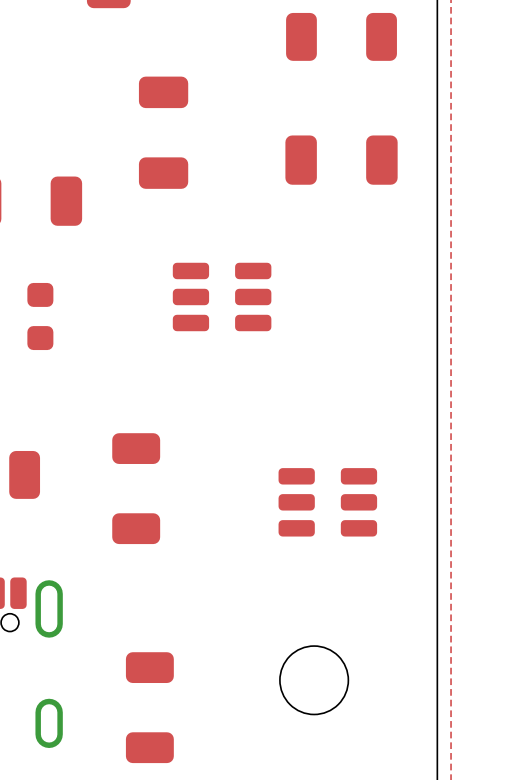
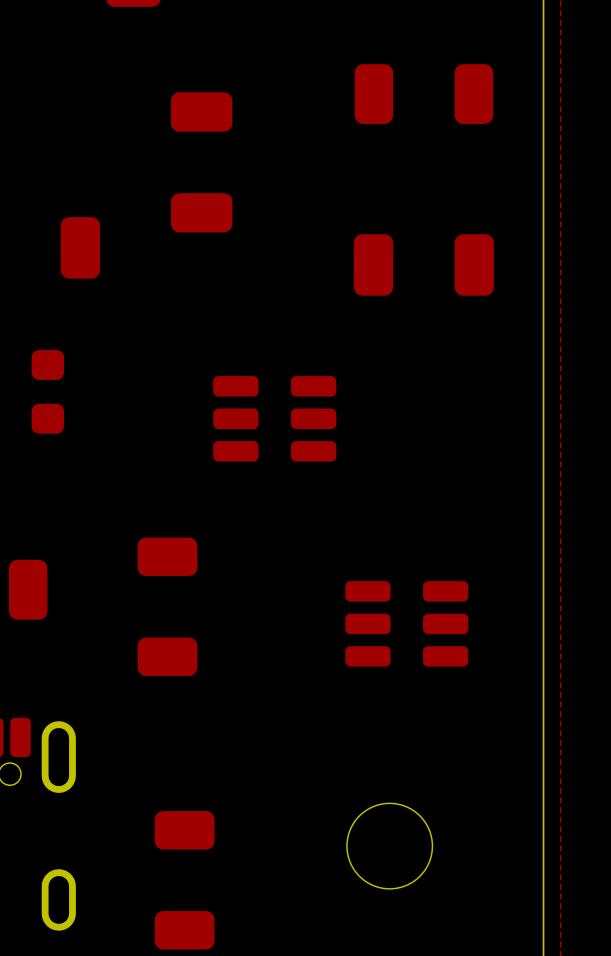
part position: (341, 36) -> (423, 94)
part position: (341, 160) -> (423, 264)
part position: (222, 296) -> (274, 418)

